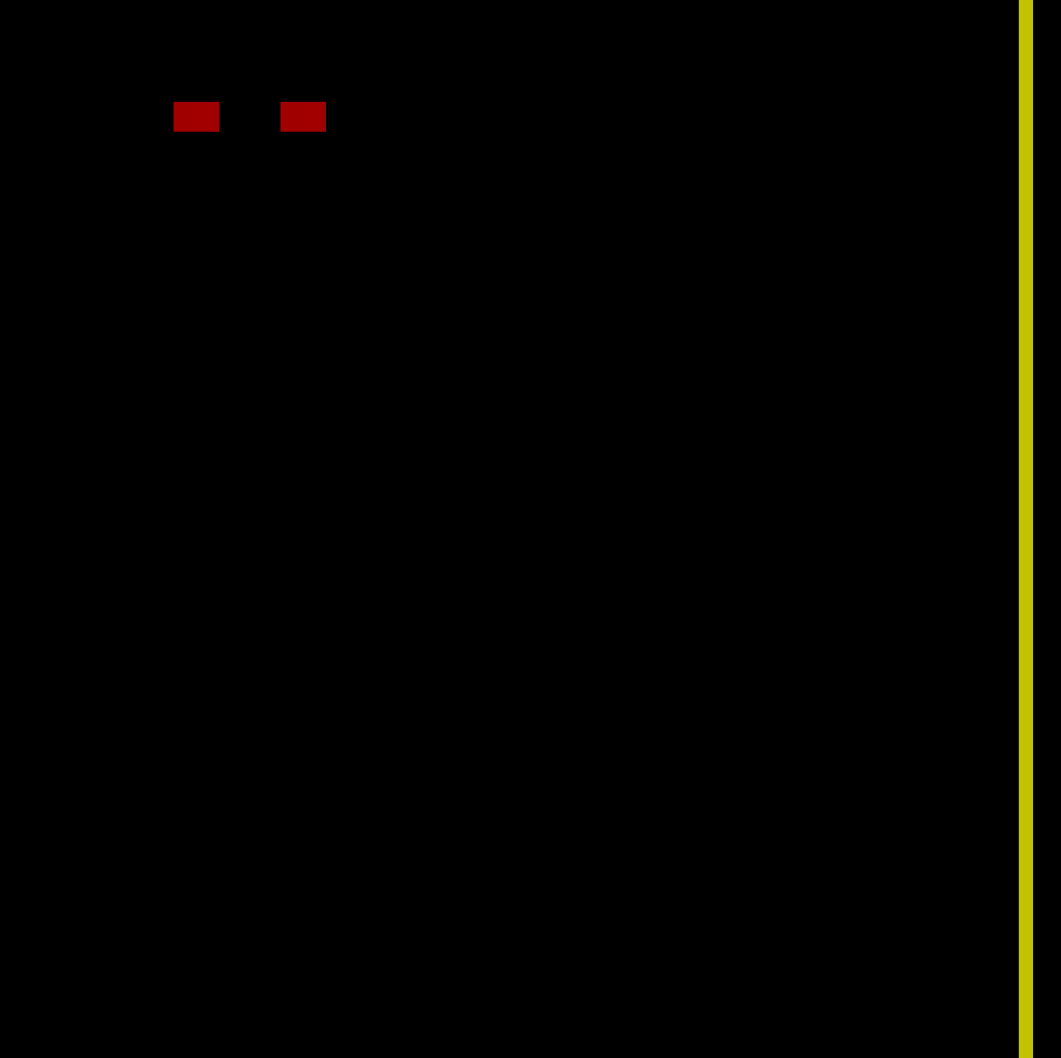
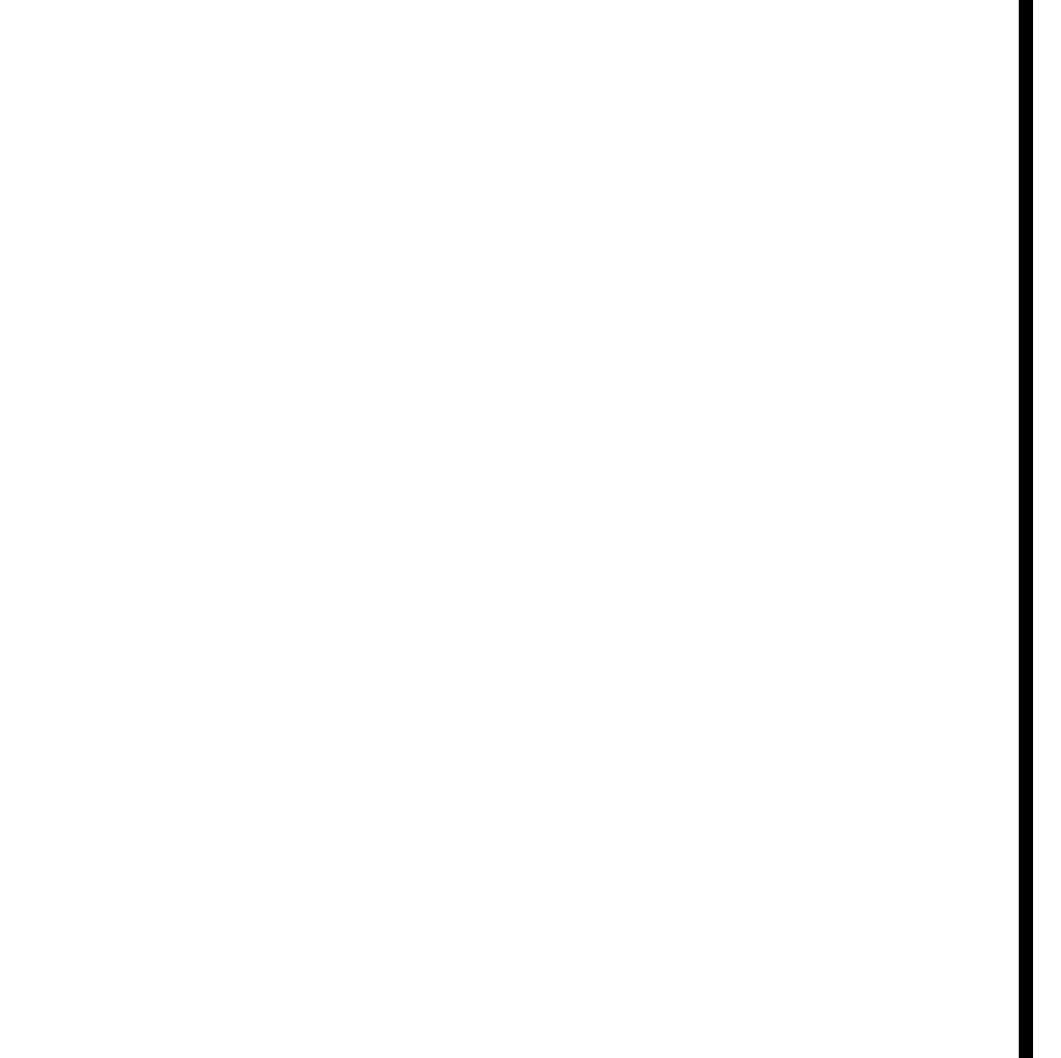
part: (249, 116) -> none

